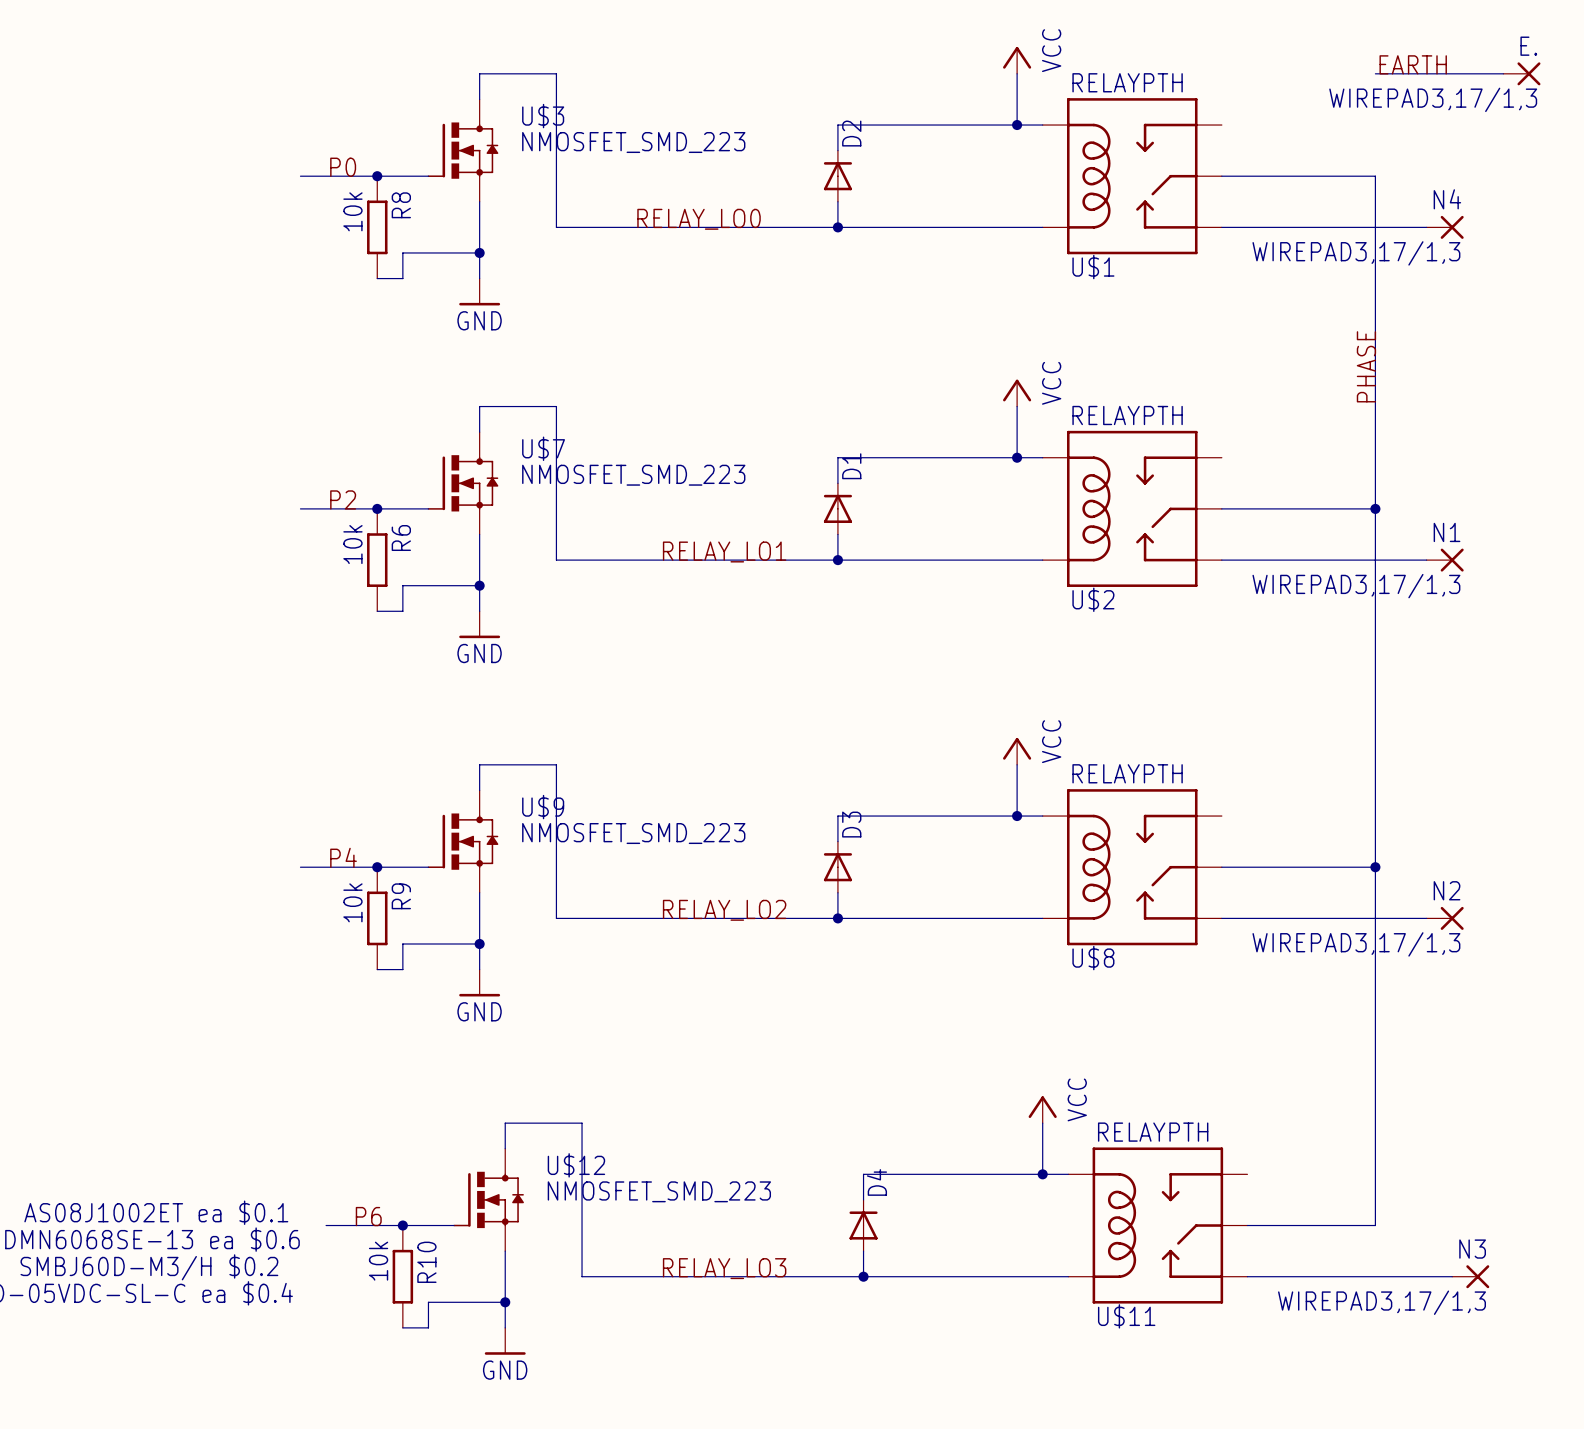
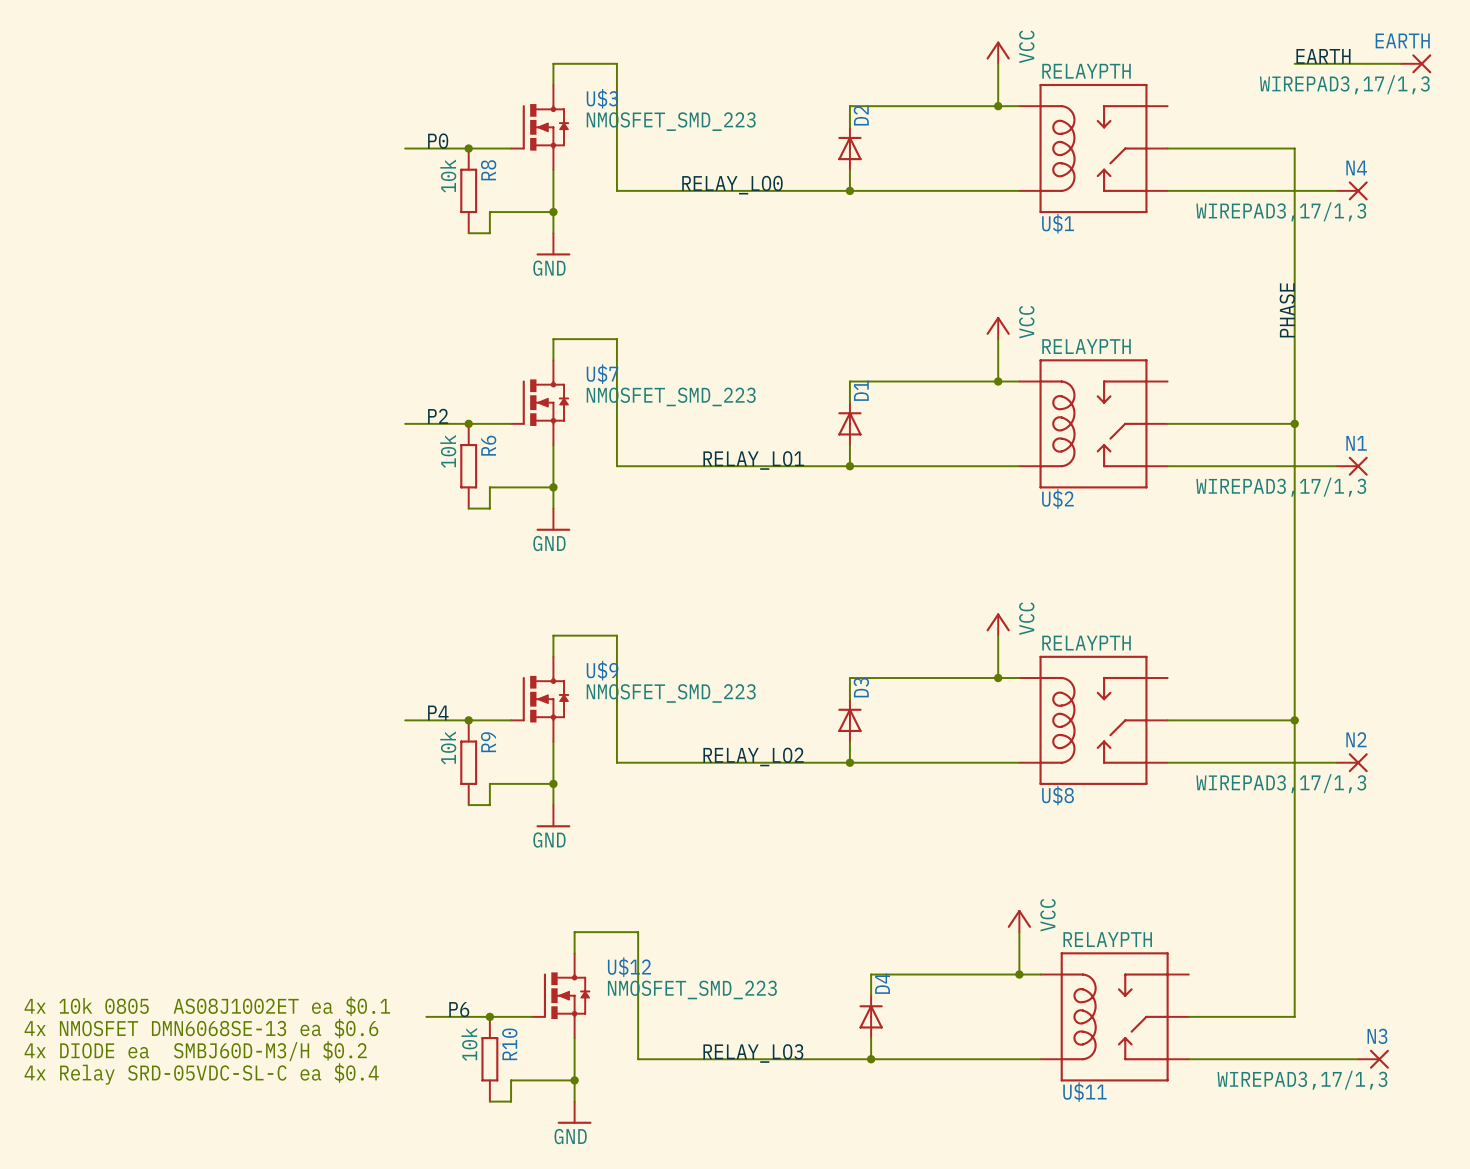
E. name: E. (1528, 46) -> EARTH (1402, 40)

